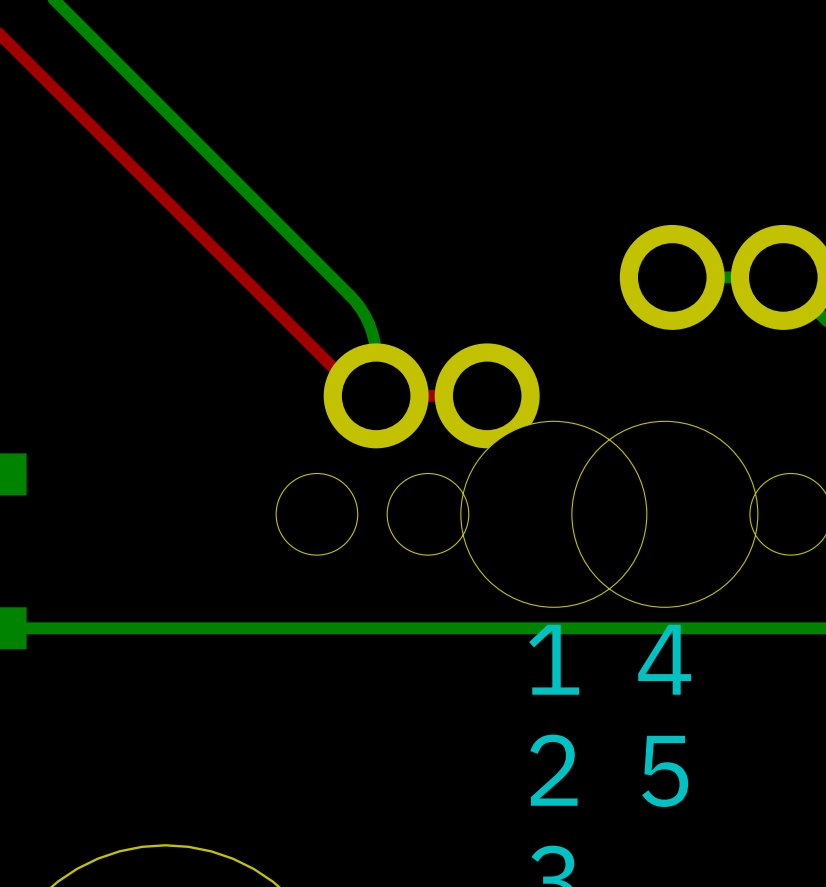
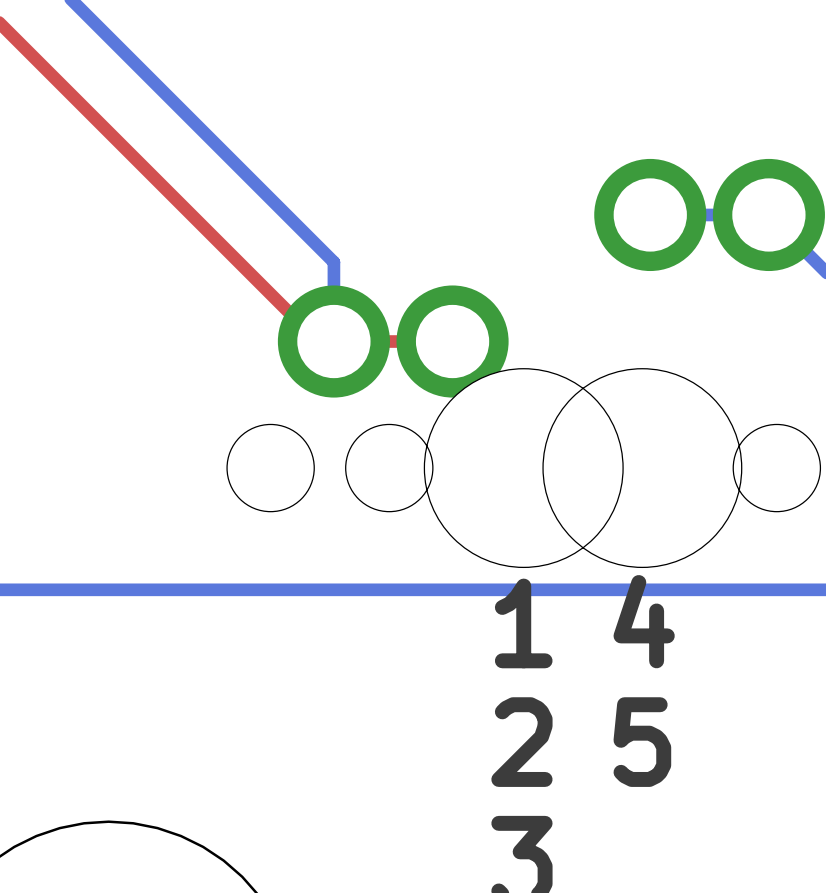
bottom track: (349, 295) (361, 309) (369, 324) (374, 341) (376, 358) -> (305, 234) (333, 262) (333, 341)

